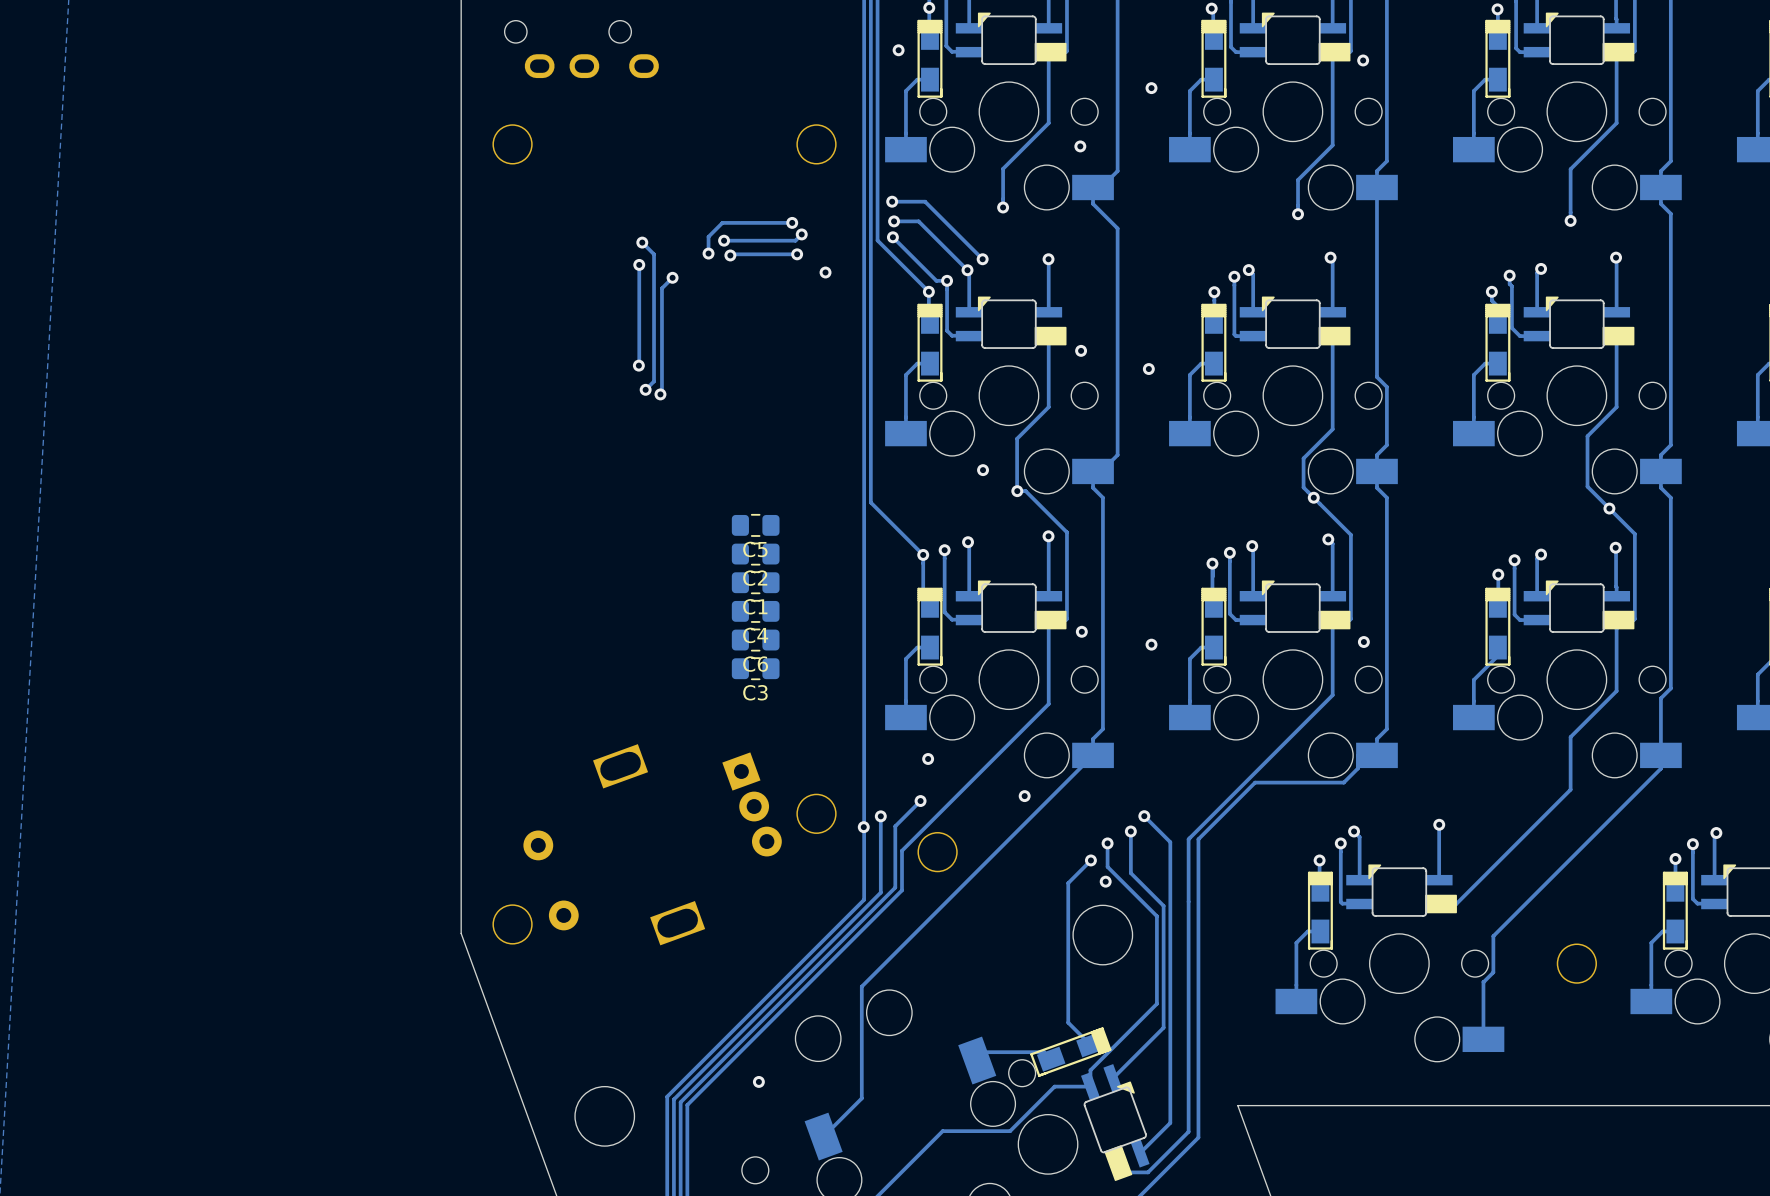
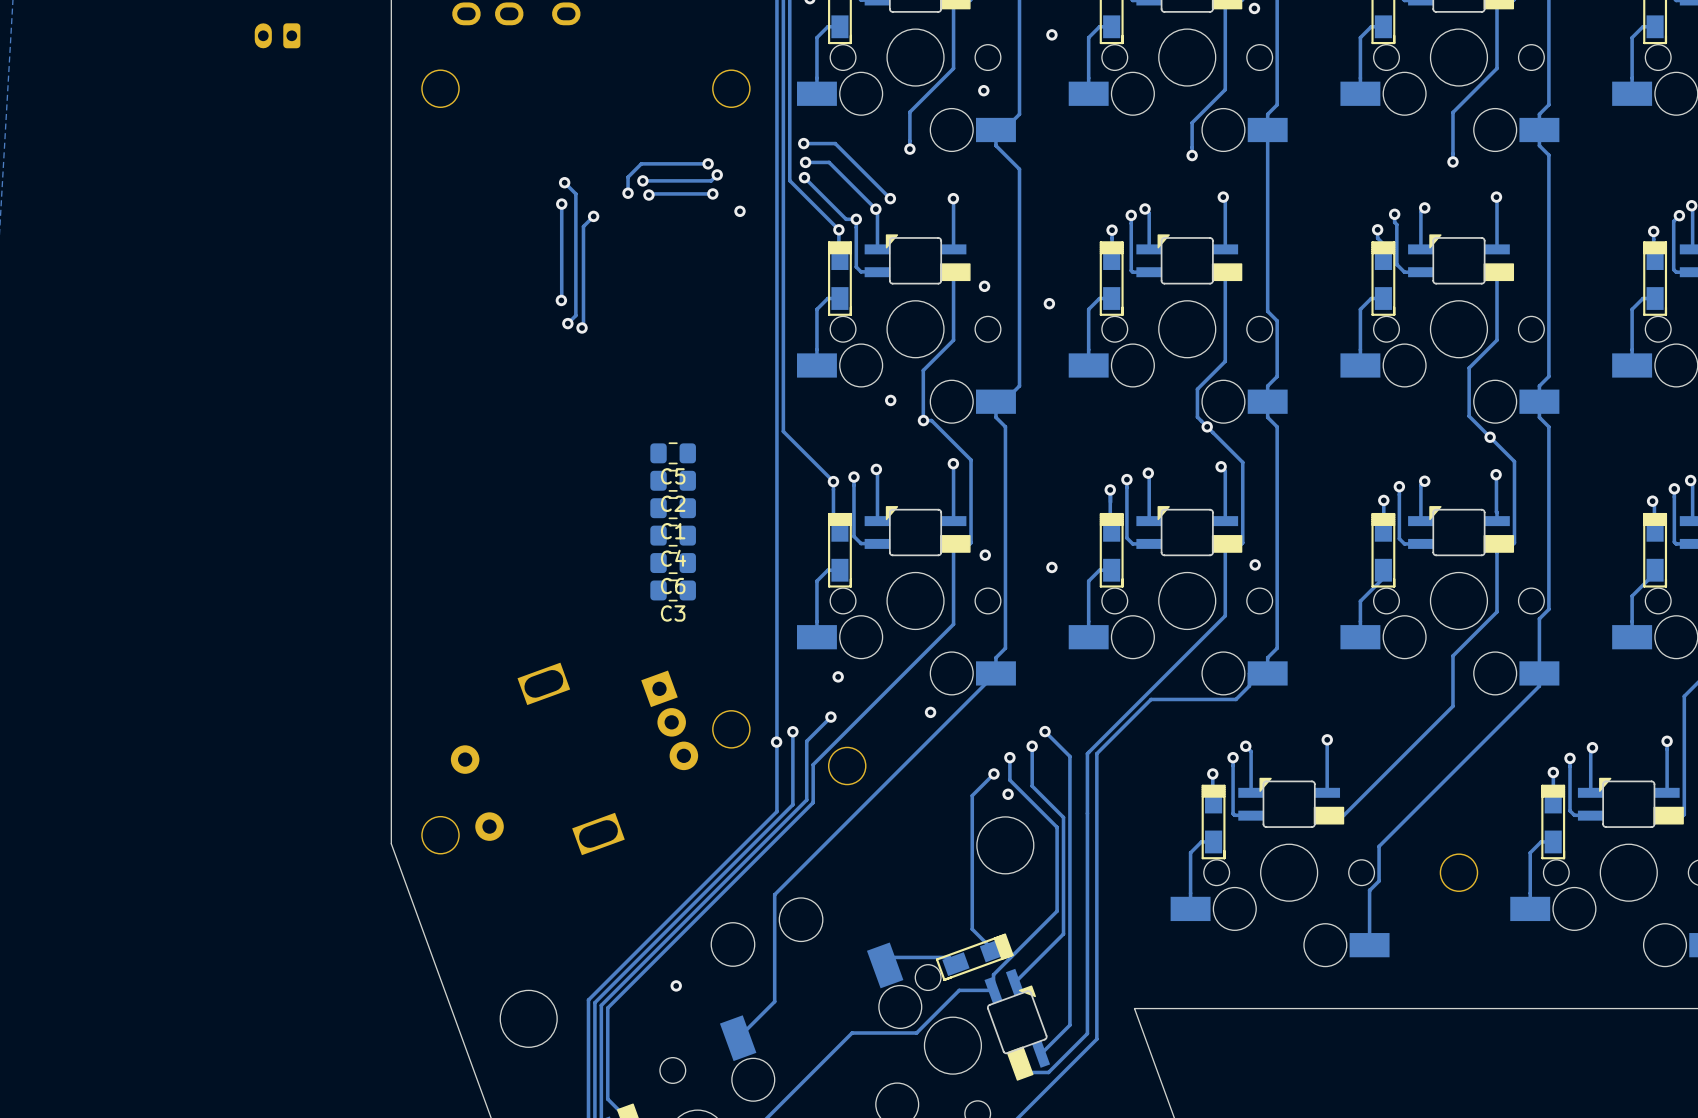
part: none -> (277, 35)

